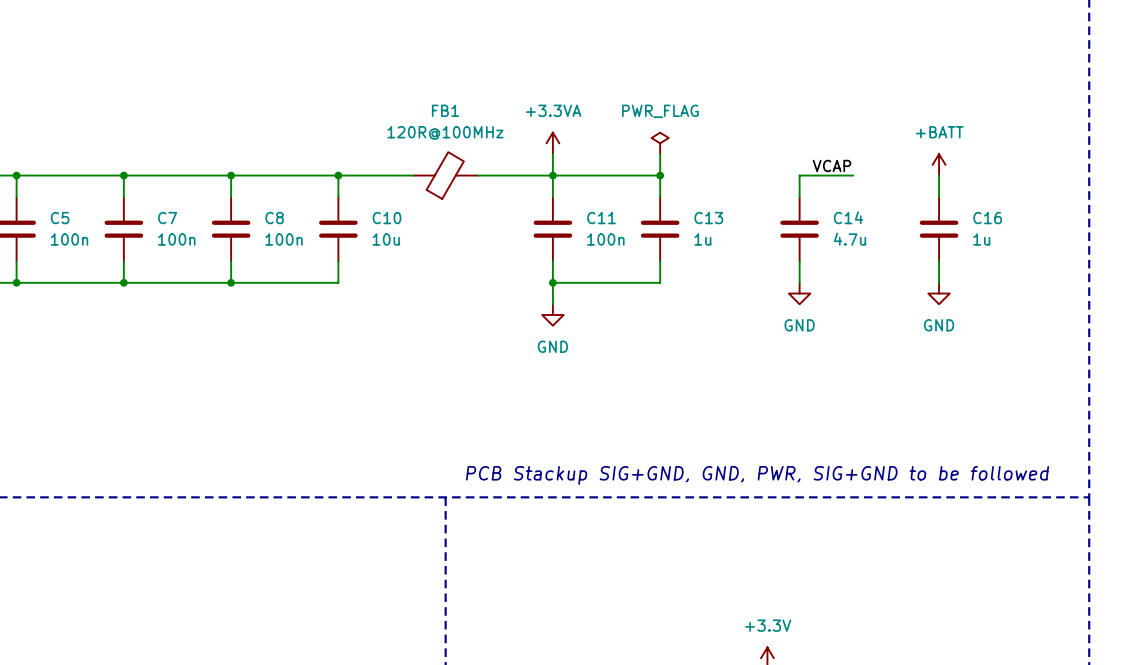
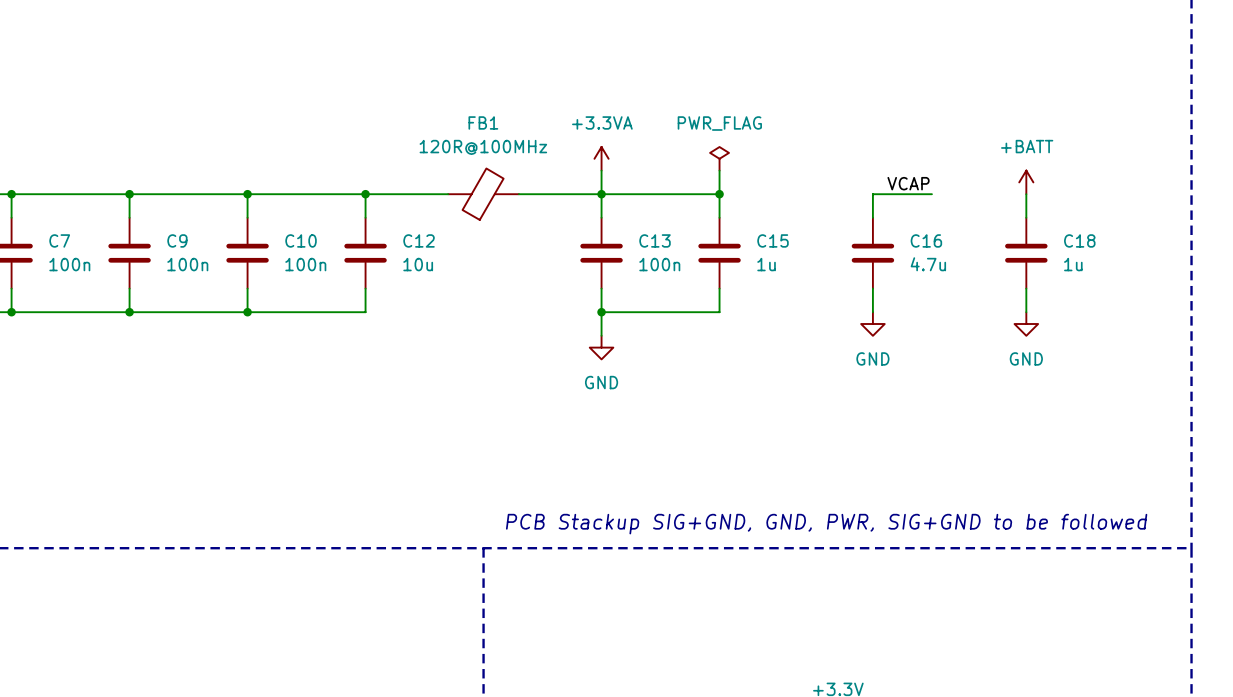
C14 name: C14 (848, 217) -> C16 (926, 240)
C5 name: C5 (60, 218) -> C7 (59, 240)
C7 name: C7 (167, 218) -> C9 (177, 240)
C8 name: C8 (274, 218) -> C10 (301, 240)
C10 name: C10 (386, 218) -> C12 (419, 240)
C11 name: C11 (601, 218) -> C13 (655, 240)
C13 name: C13 (708, 218) -> C15 (773, 240)
C16 name: C16 (987, 218) -> C18 (1079, 240)

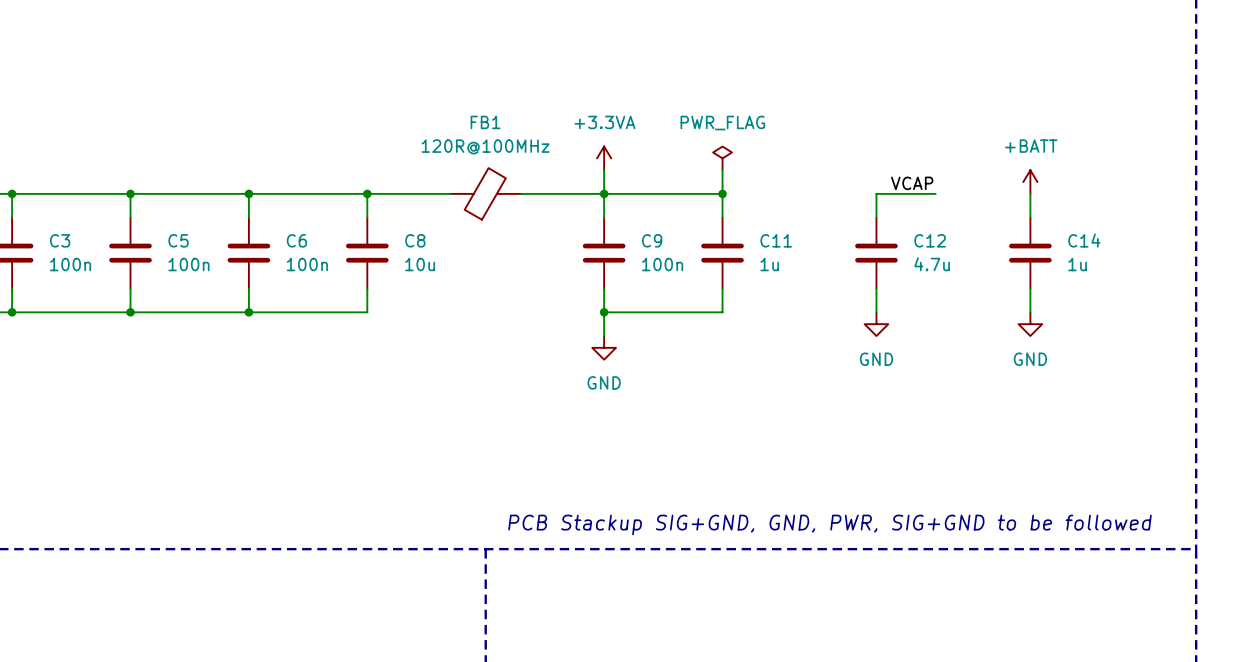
C7 name: C7 (59, 240) -> C3 (60, 240)
C9 name: C9 (177, 240) -> C5 (178, 240)
C10 name: C10 (301, 240) -> C6 (296, 240)
C12 name: C12 (419, 240) -> C8 (415, 240)
C13 name: C13 (655, 240) -> C9 (652, 240)
C15 name: C15 (773, 240) -> C11 (776, 240)
C16 name: C16 (926, 240) -> C12 (930, 240)
C18 name: C18 (1079, 240) -> C14 (1084, 240)

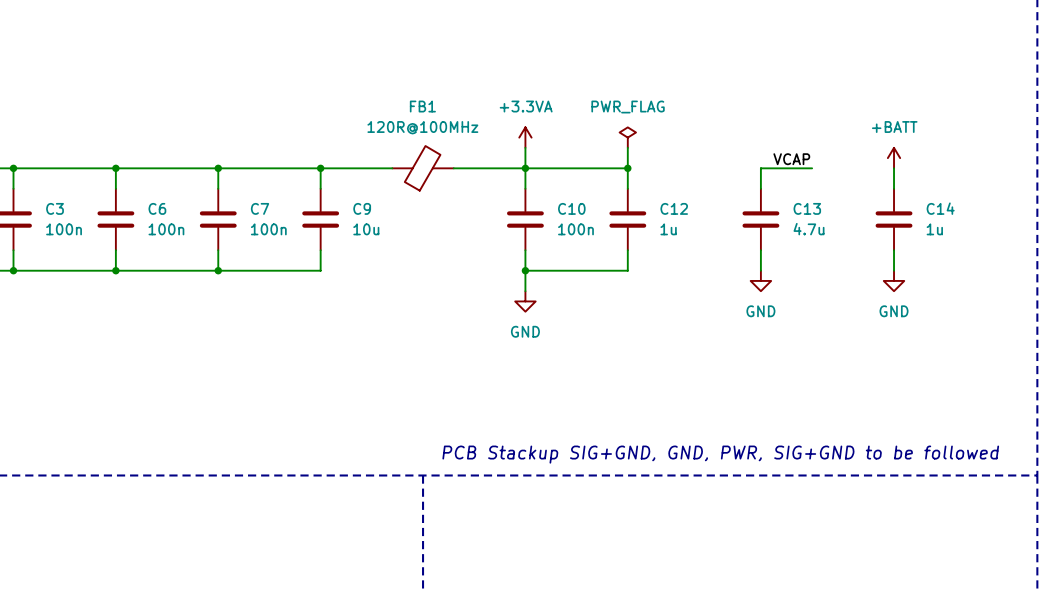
C5 name: C5 (178, 240) -> C6 (157, 208)
C6 name: C6 (296, 240) -> C7 (260, 208)
C8 name: C8 (415, 240) -> C9 (362, 208)
C9 name: C9 (652, 240) -> C10 (571, 208)
C11 name: C11 (776, 240) -> C12 (674, 208)
C12 name: C12 (930, 240) -> C13 (807, 208)

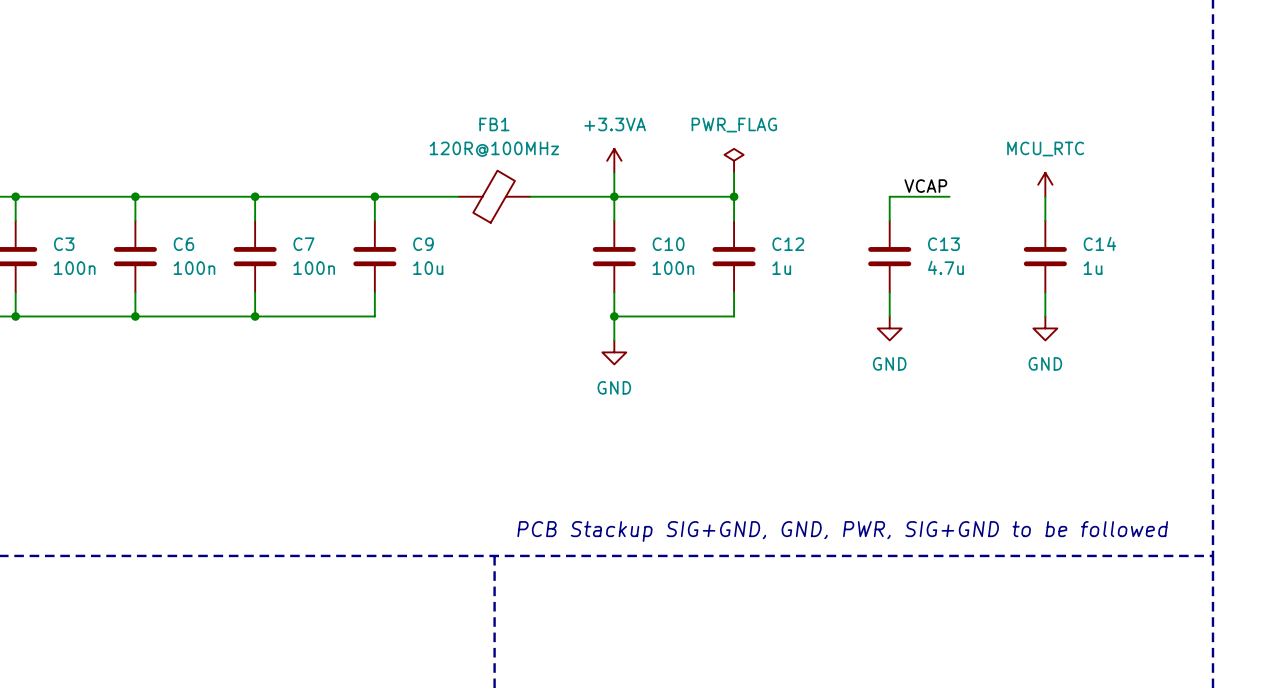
power symbol: +BATT (894, 158) -> MCU_RTC (1045, 184)

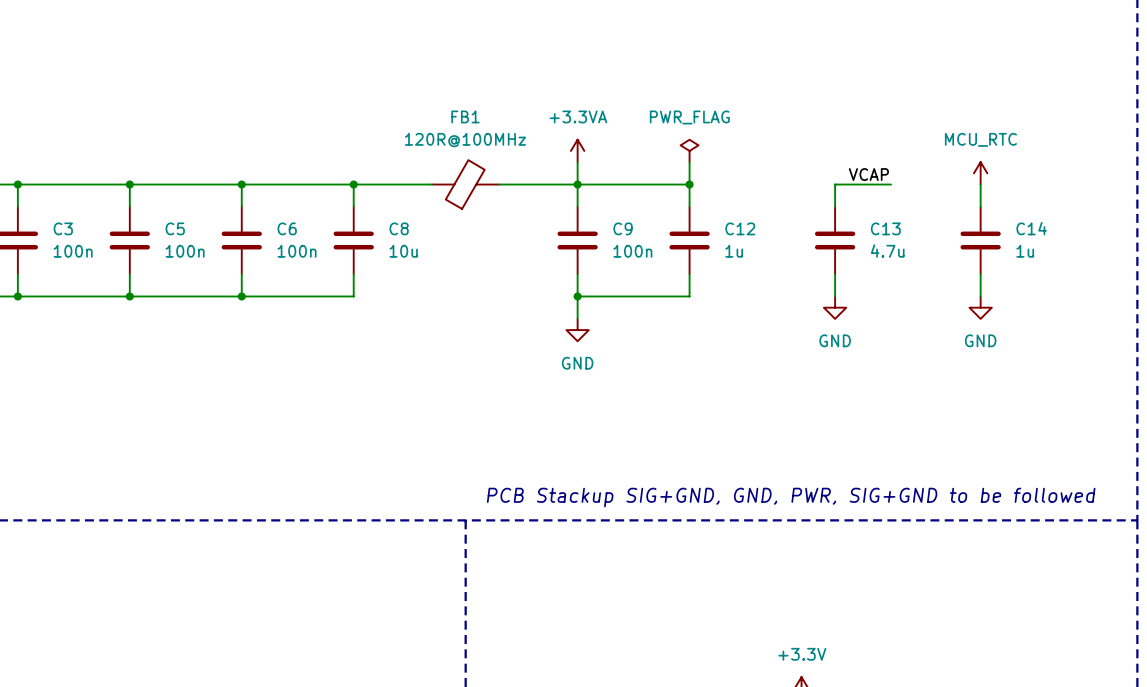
C6 name: C6 (183, 244) -> C5 (175, 228)
C7 name: C7 (303, 244) -> C6 (287, 228)
C9 name: C9 (423, 244) -> C8 (399, 228)
C10 name: C10 (668, 244) -> C9 (623, 228)

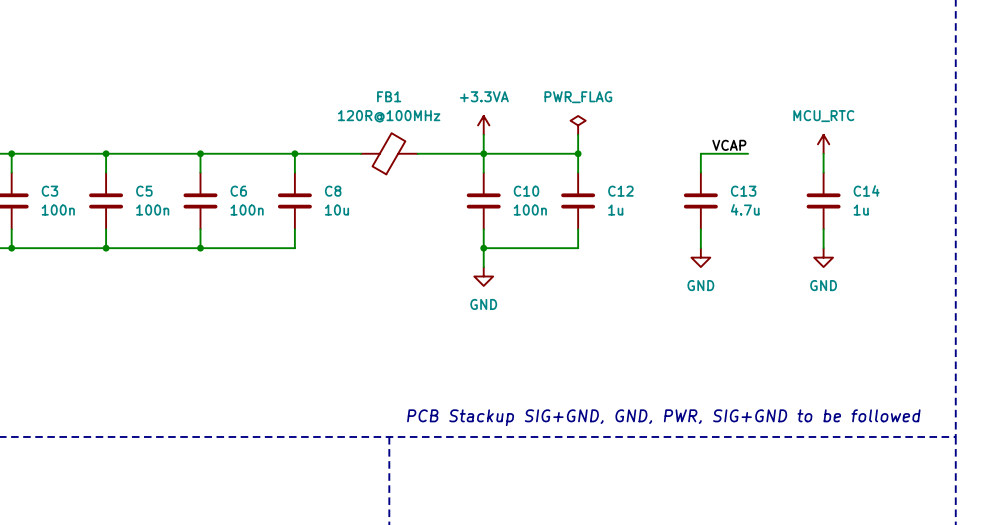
C9 name: C9 (623, 228) -> C10 (526, 191)

